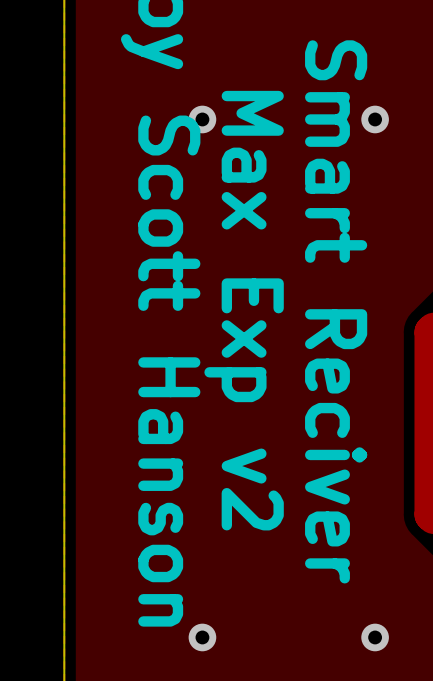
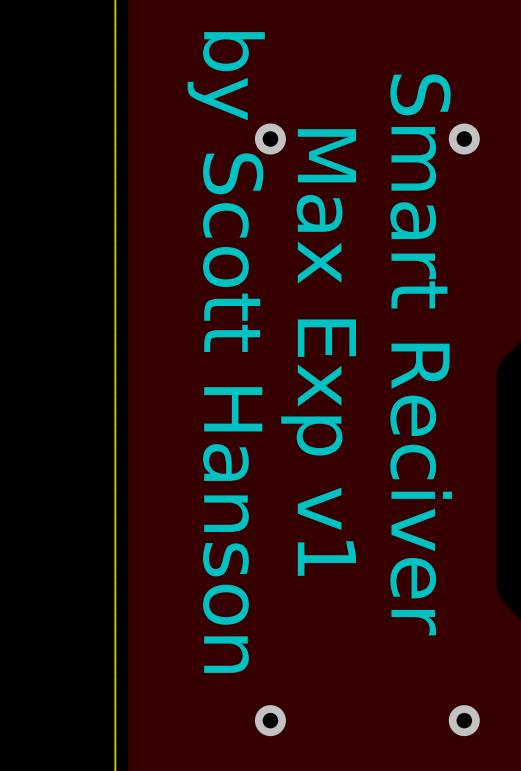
text: Max Exp v2 (244, 310) -> Max Exp v1 (318, 352)

